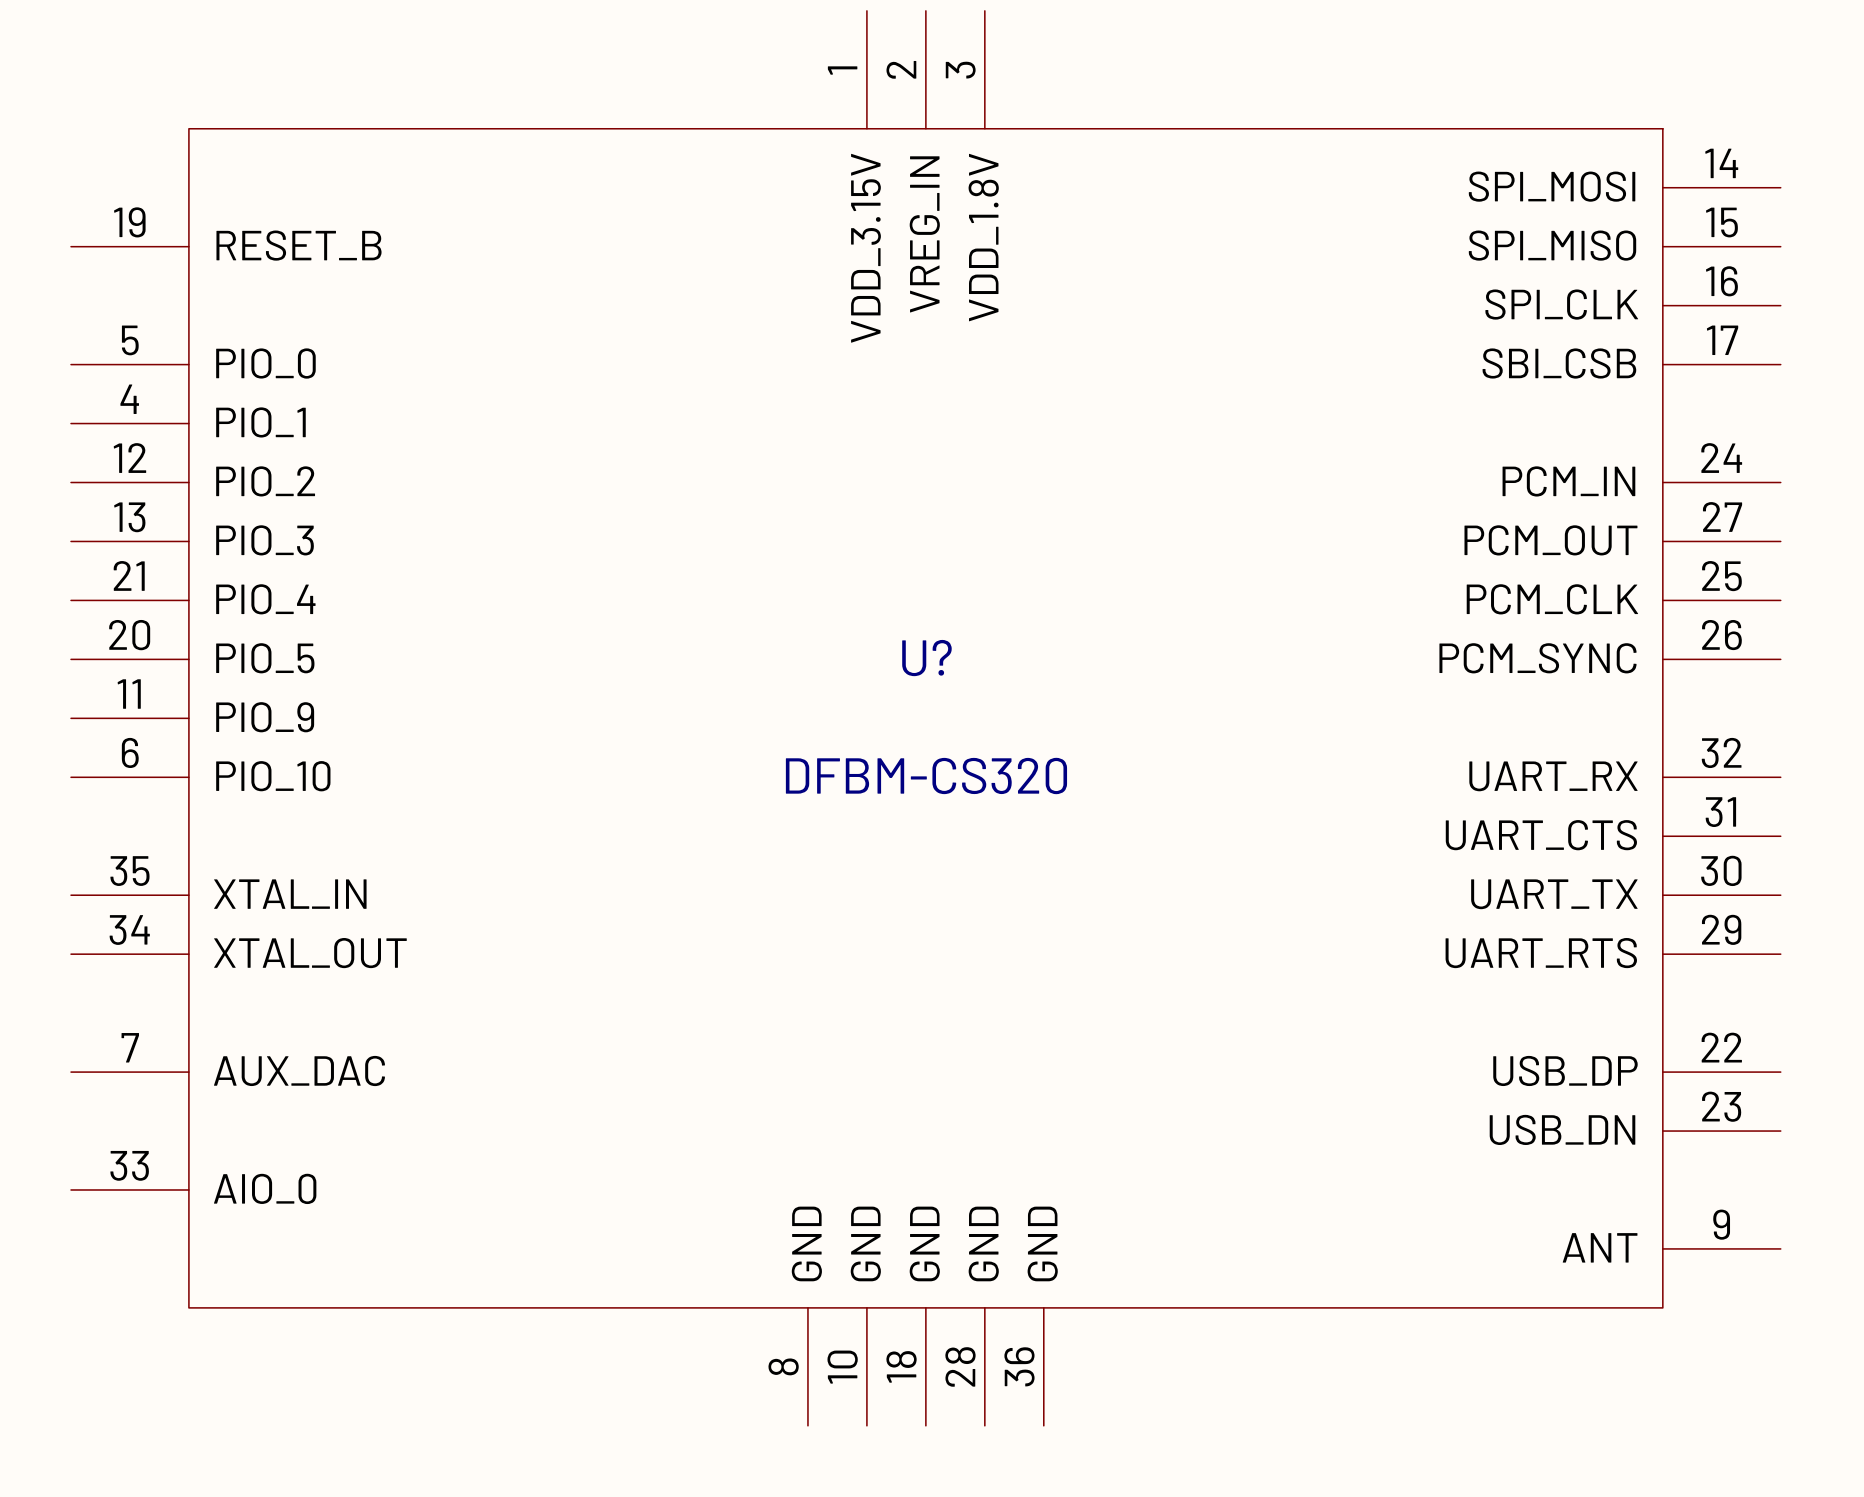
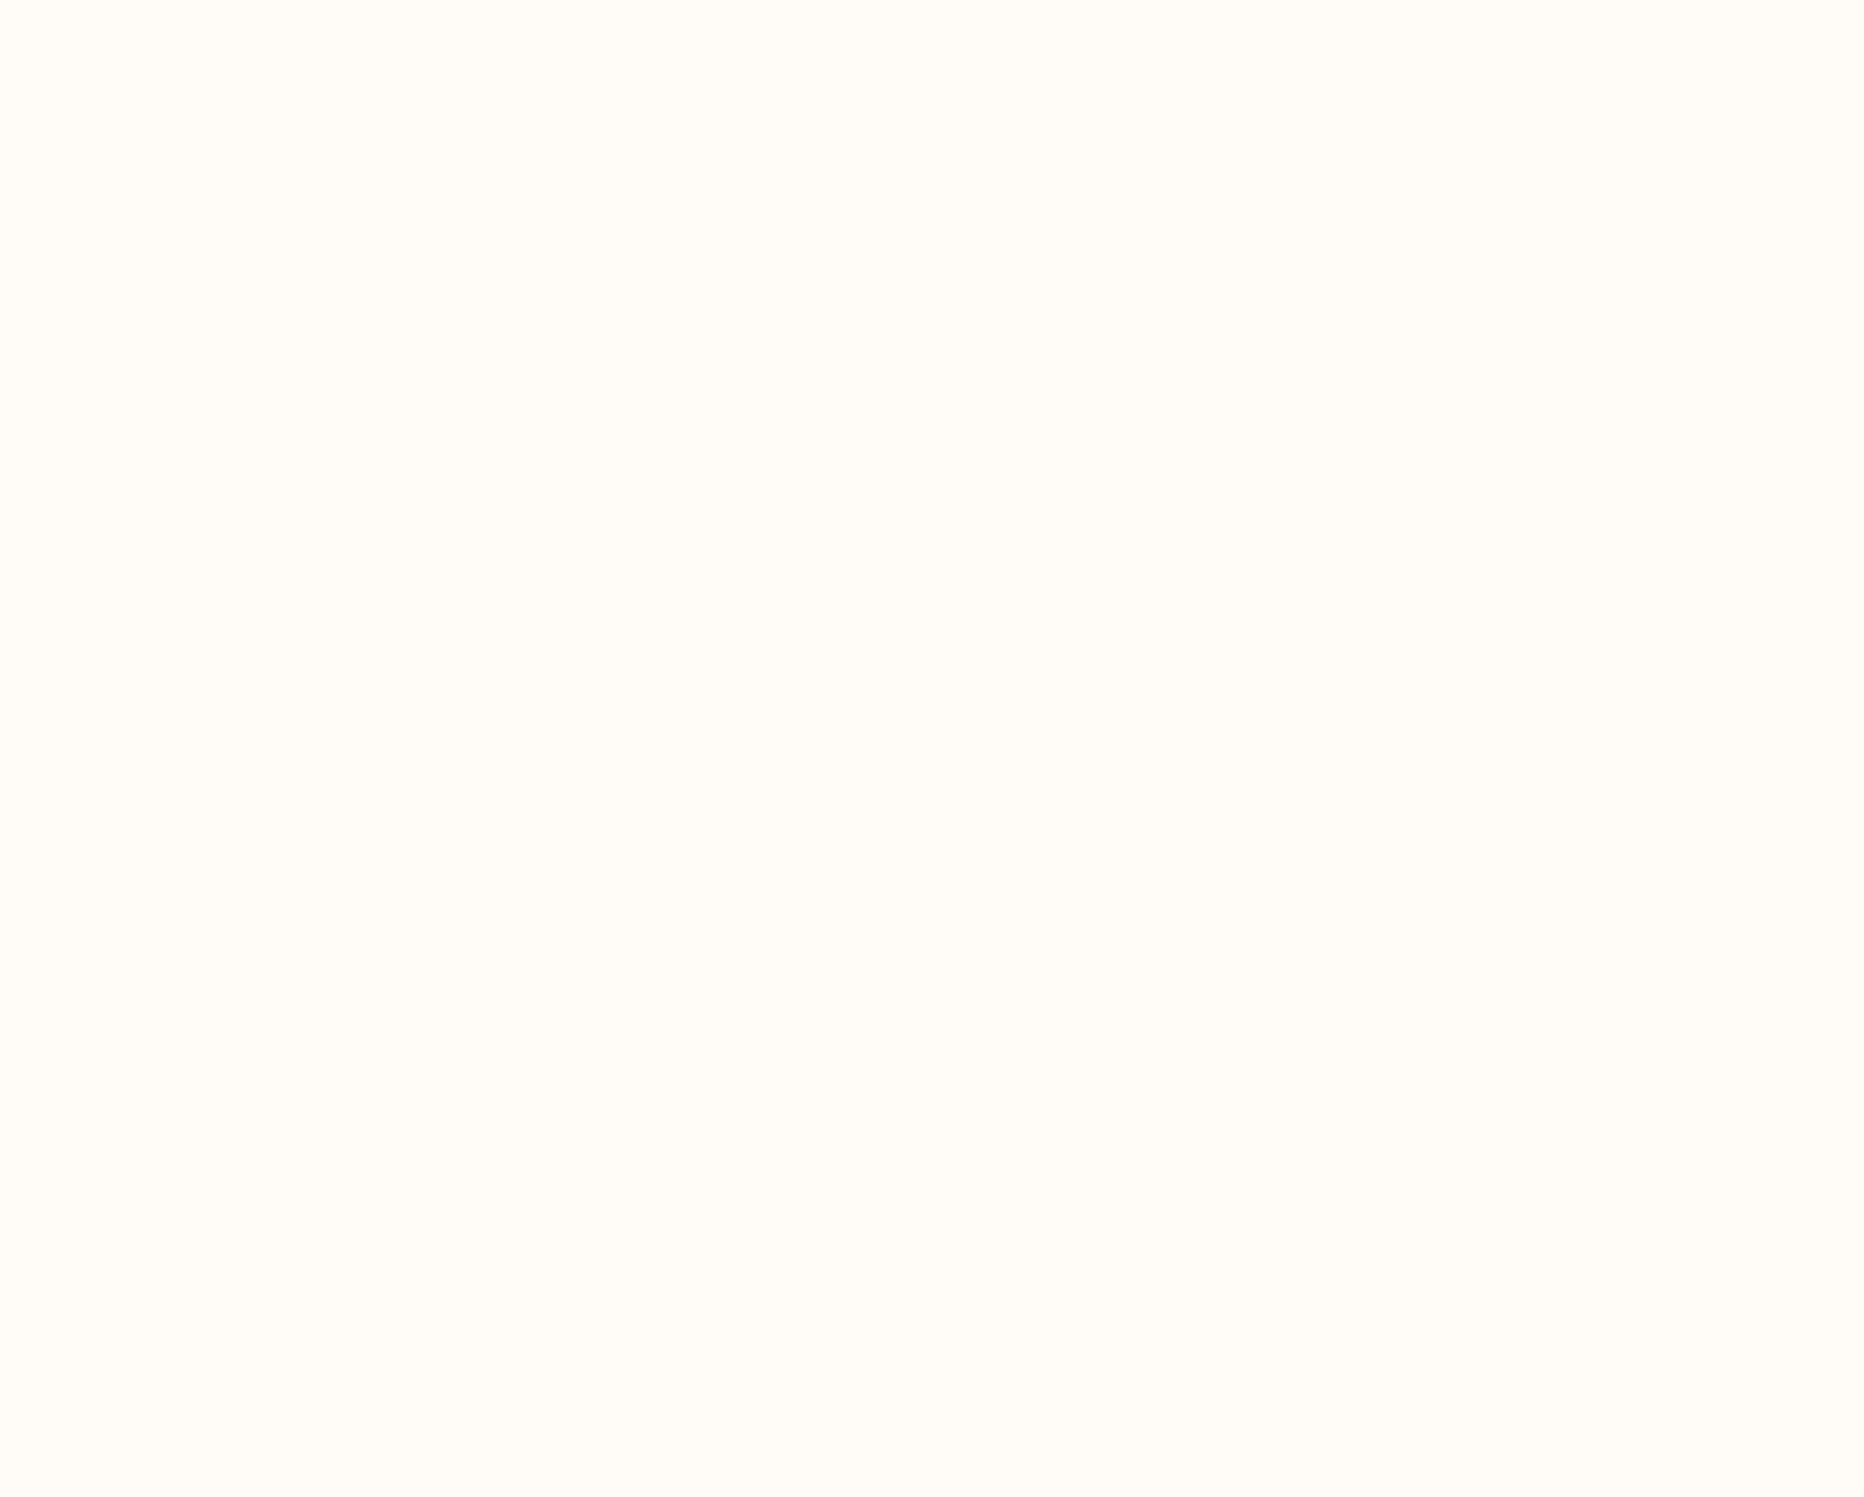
U?: DFBM-CS320 (925, 718) -> none

